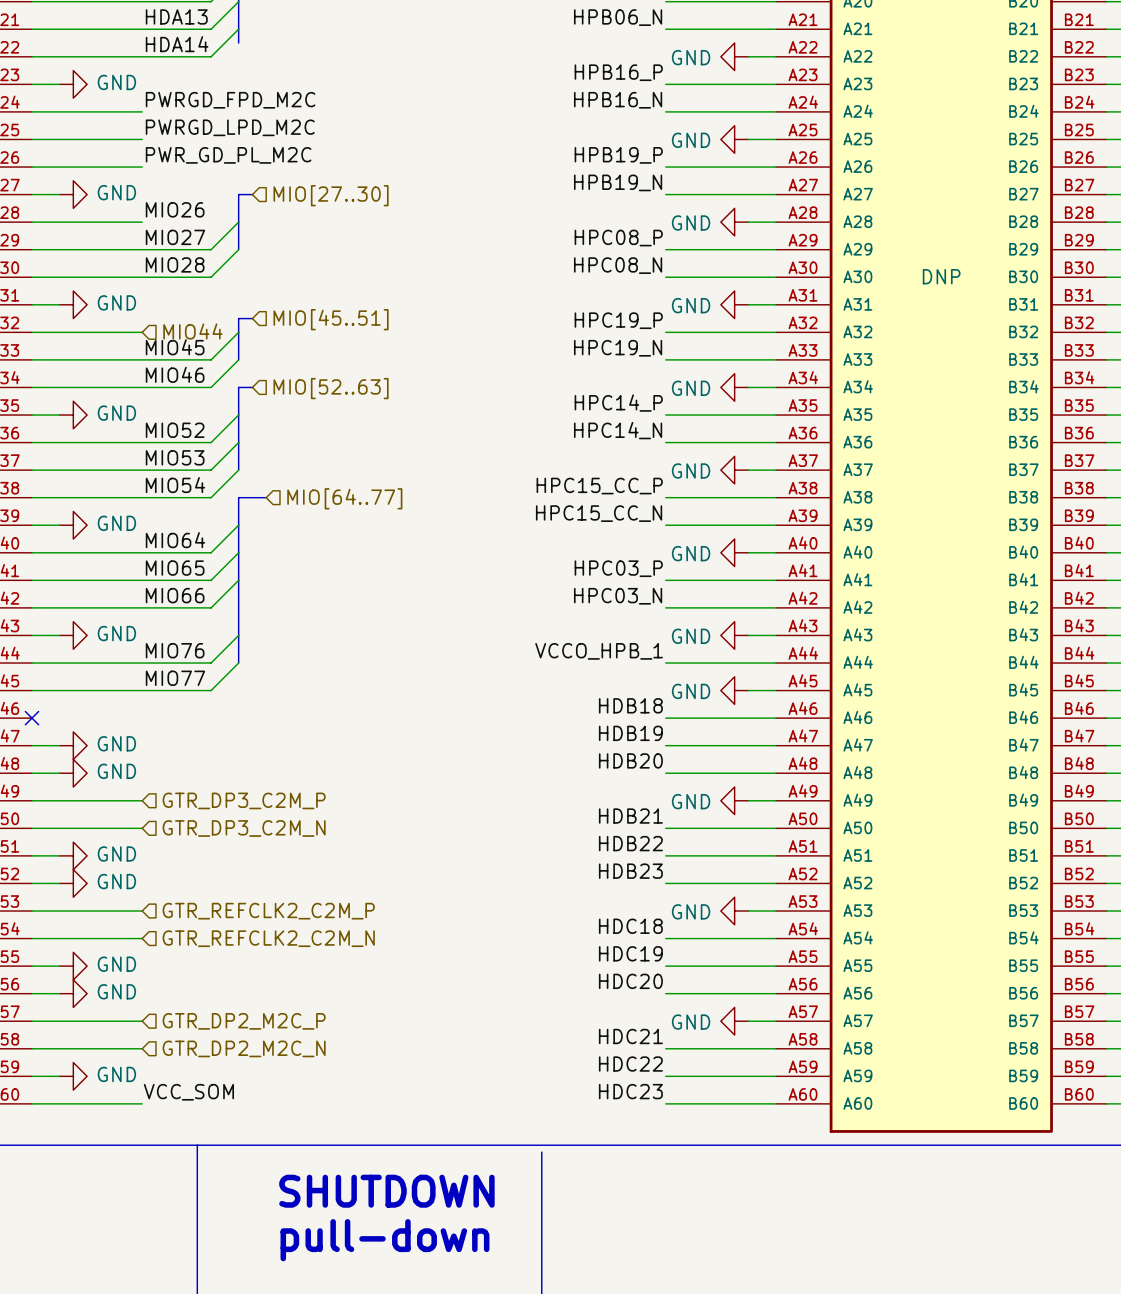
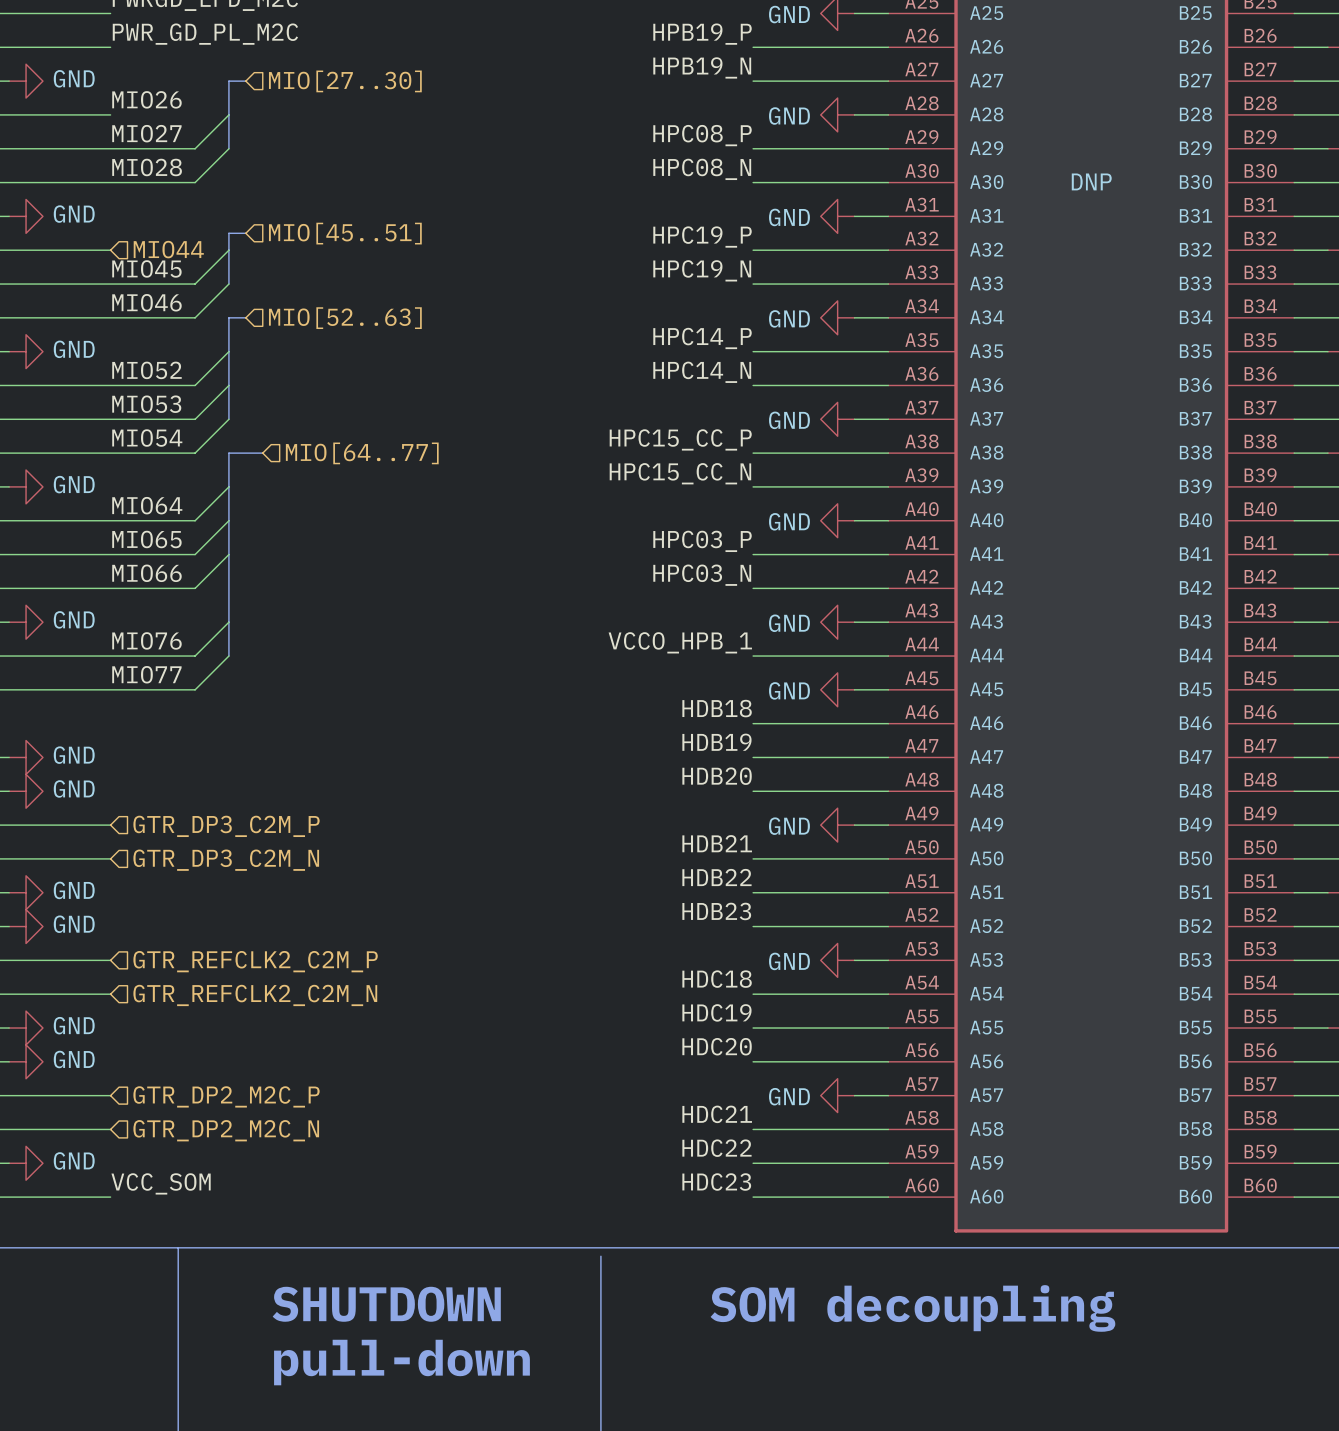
text: none -> SOM decoupling (912, 1308)

